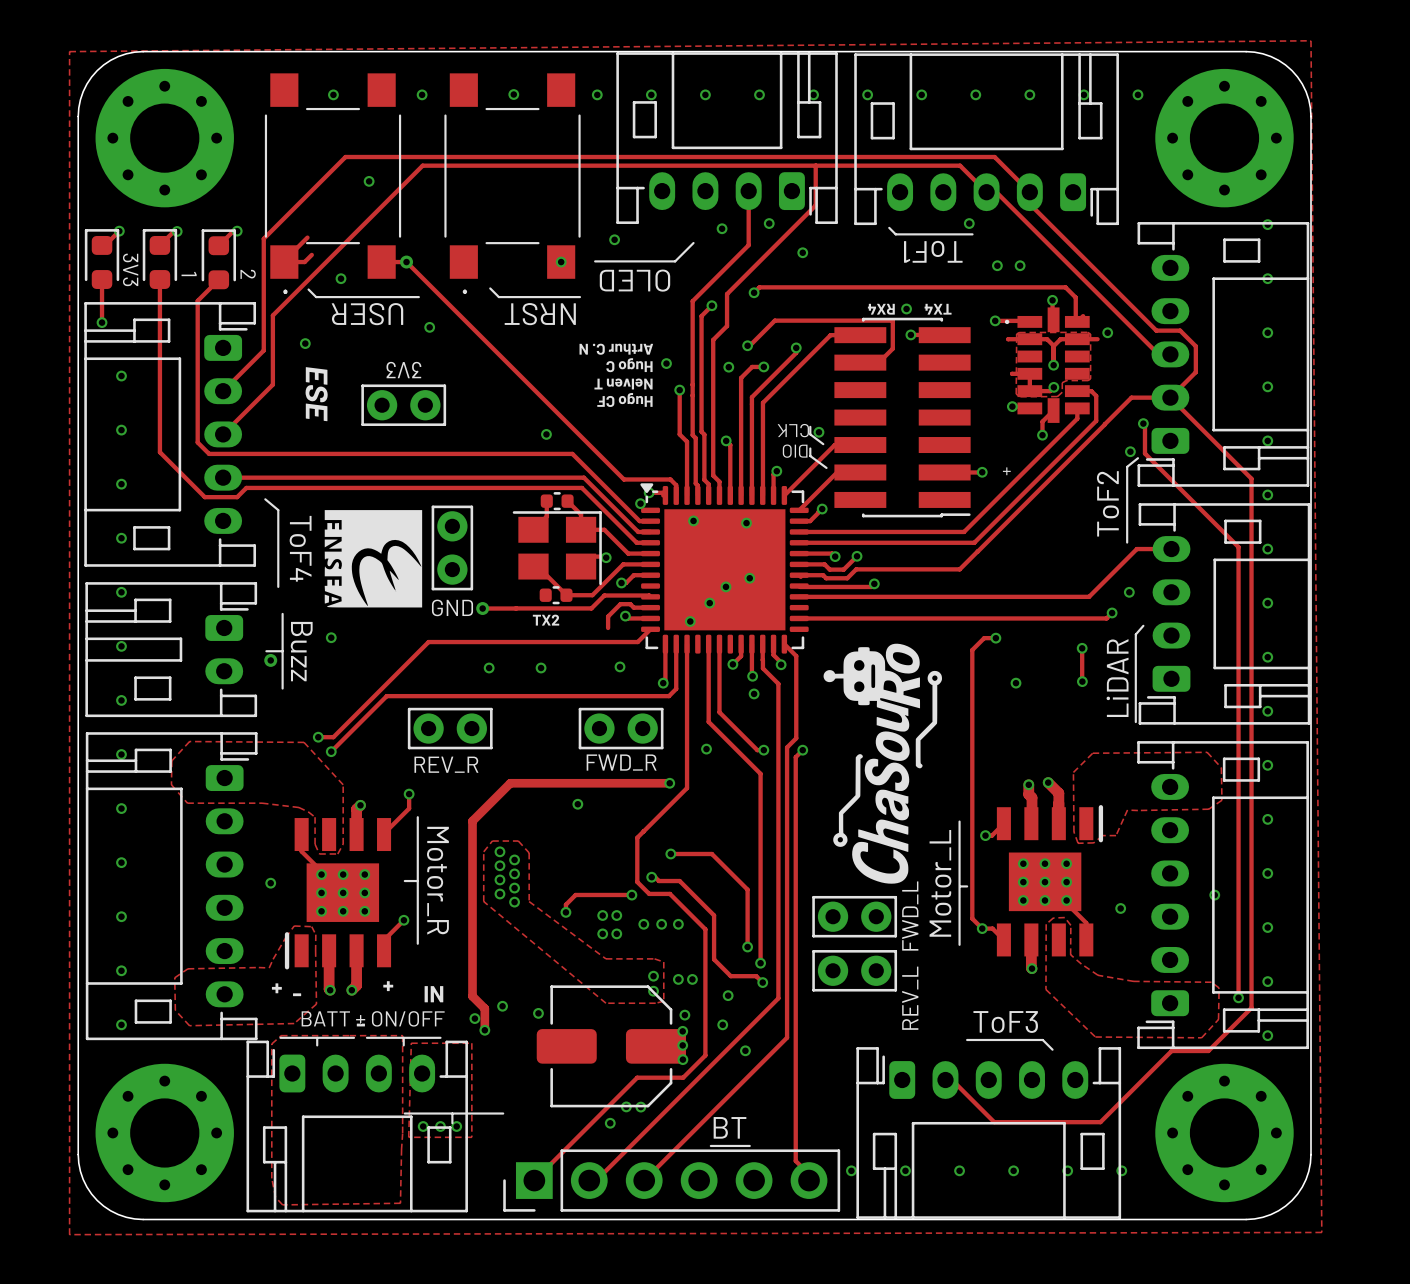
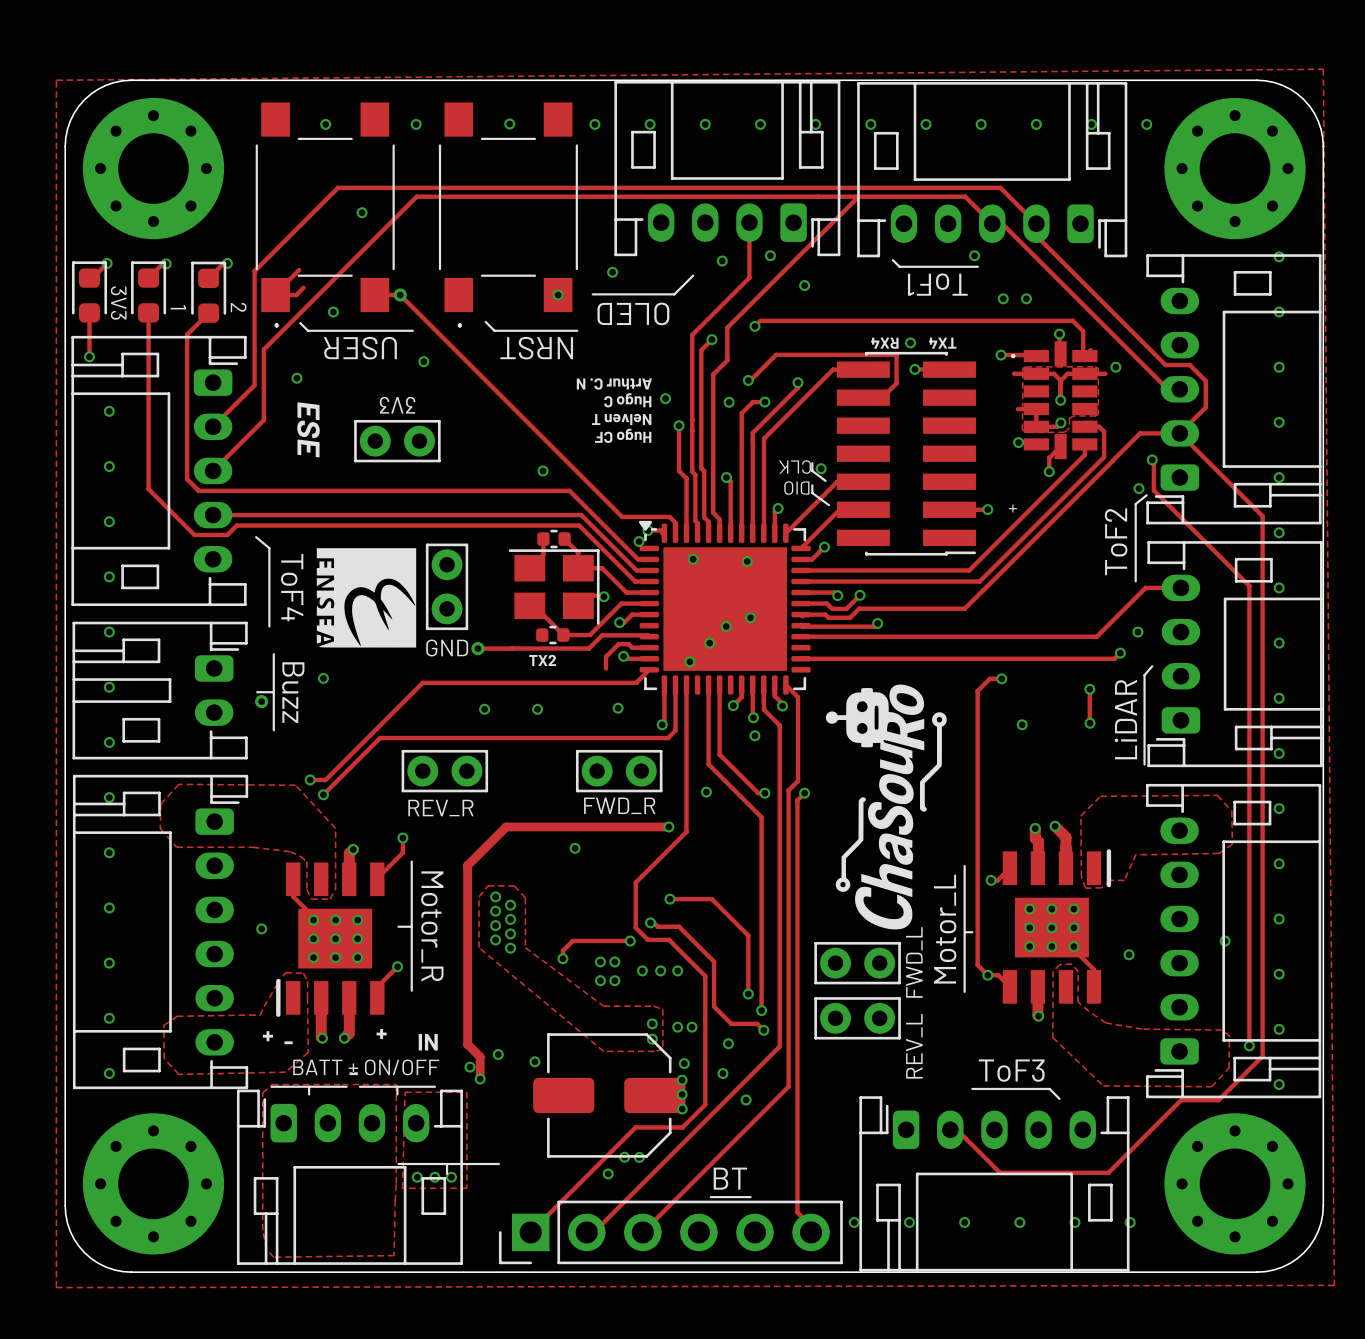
track: (815, 165) (815, 205) -> (858, 196) (818, 237)

